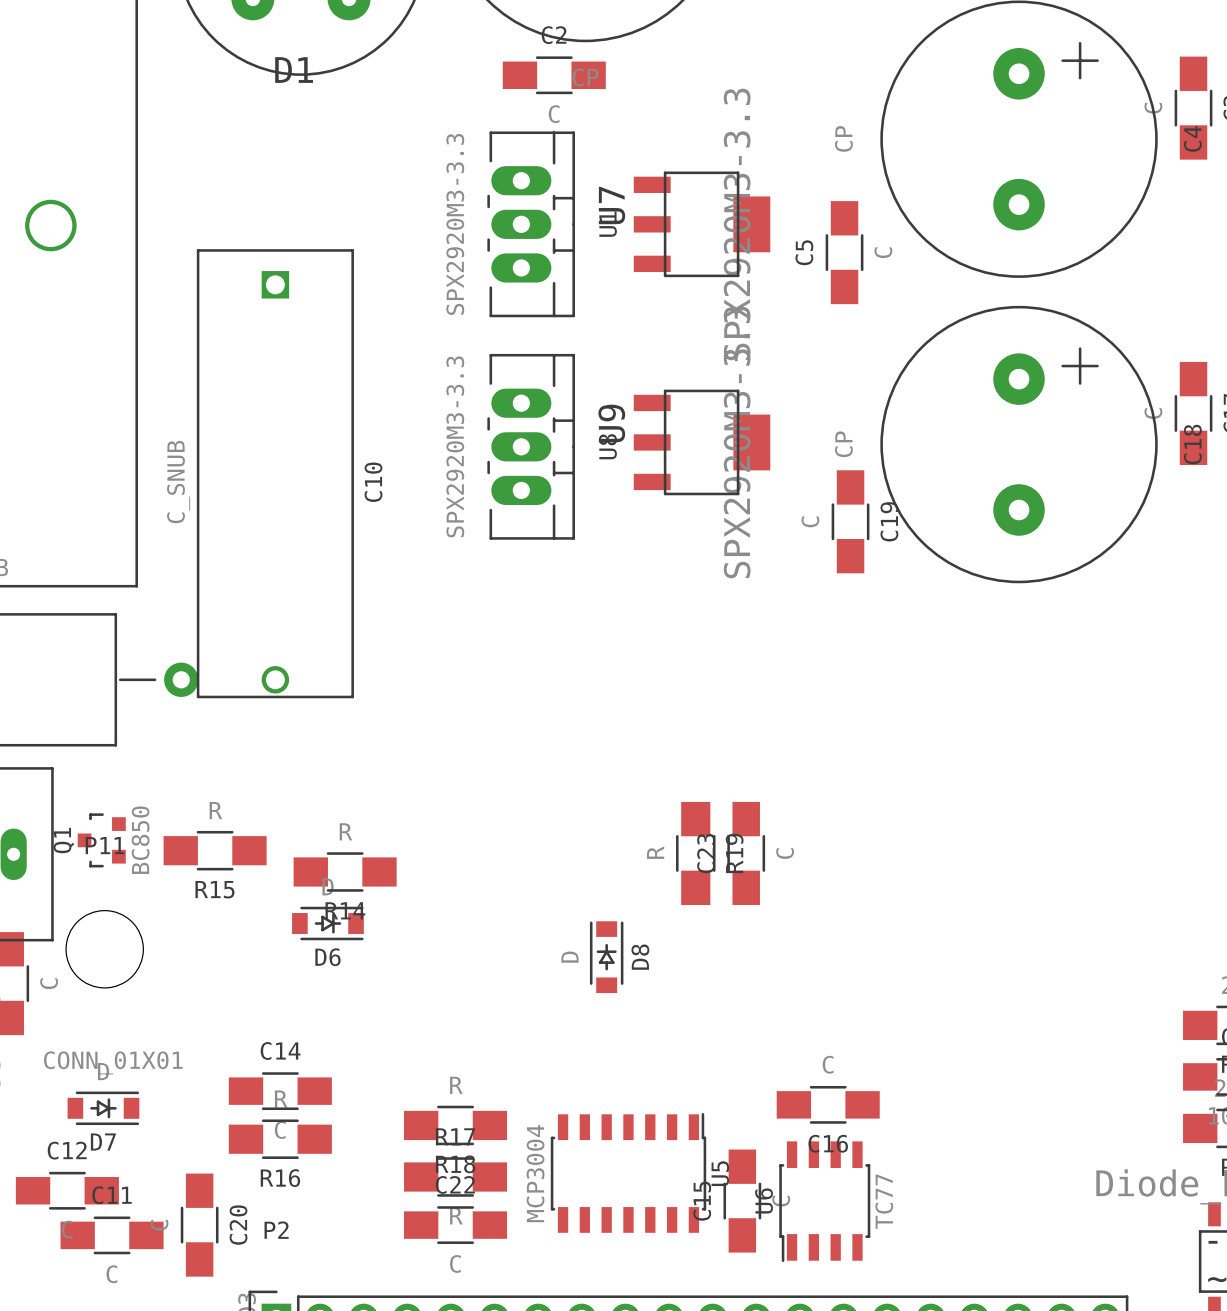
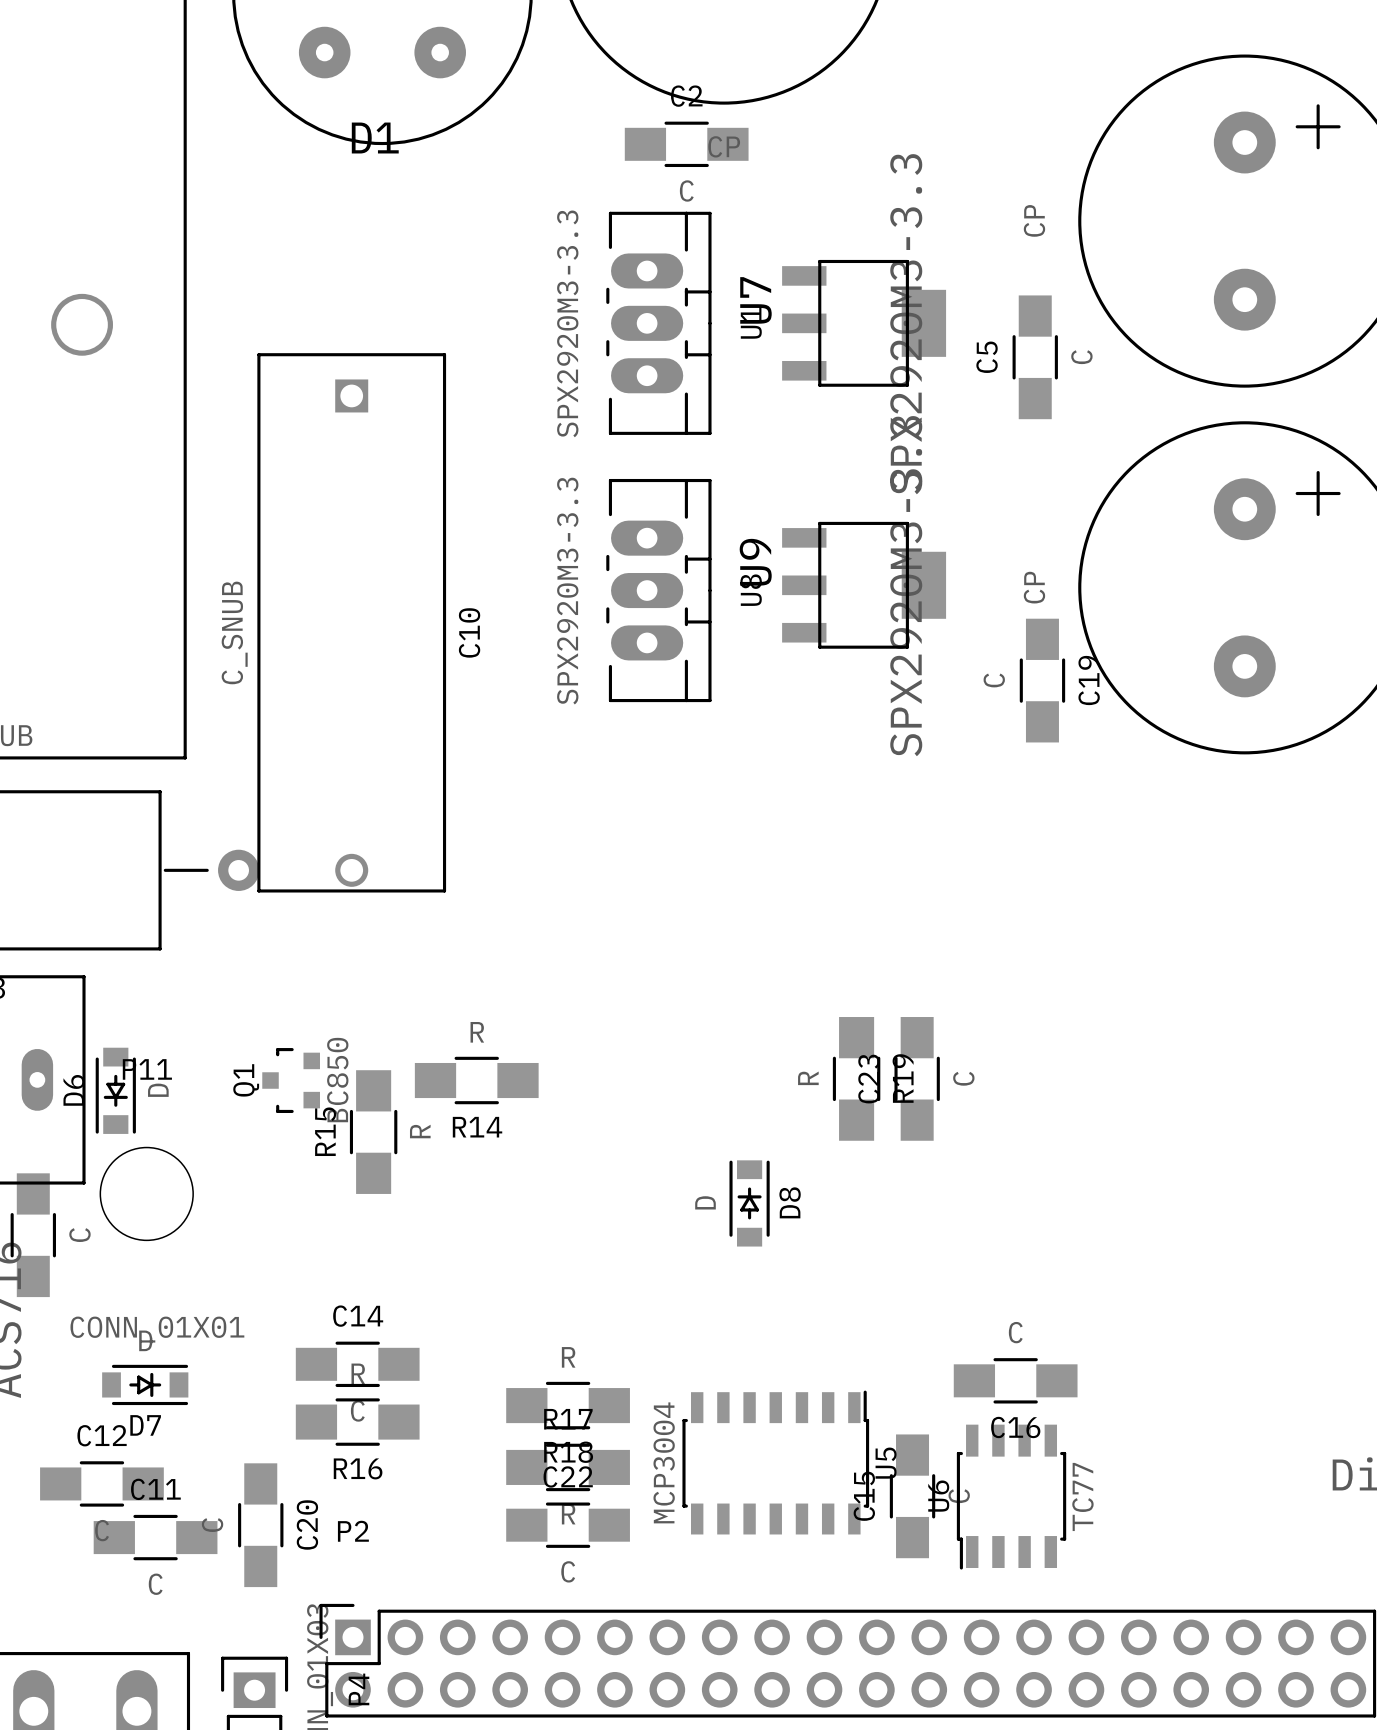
Q1 position: (101, 840) -> (291, 1080)
R15 rotation: 0° (215, 850) -> 90° clockwise (373, 1132)
R15 position: (215, 850) -> (373, 1132)
R14 position: (345, 871) -> (476, 1080)
D6 rotation: 0° (327, 923) -> 90° clockwise (115, 1090)
D6 position: (327, 923) -> (115, 1090)

